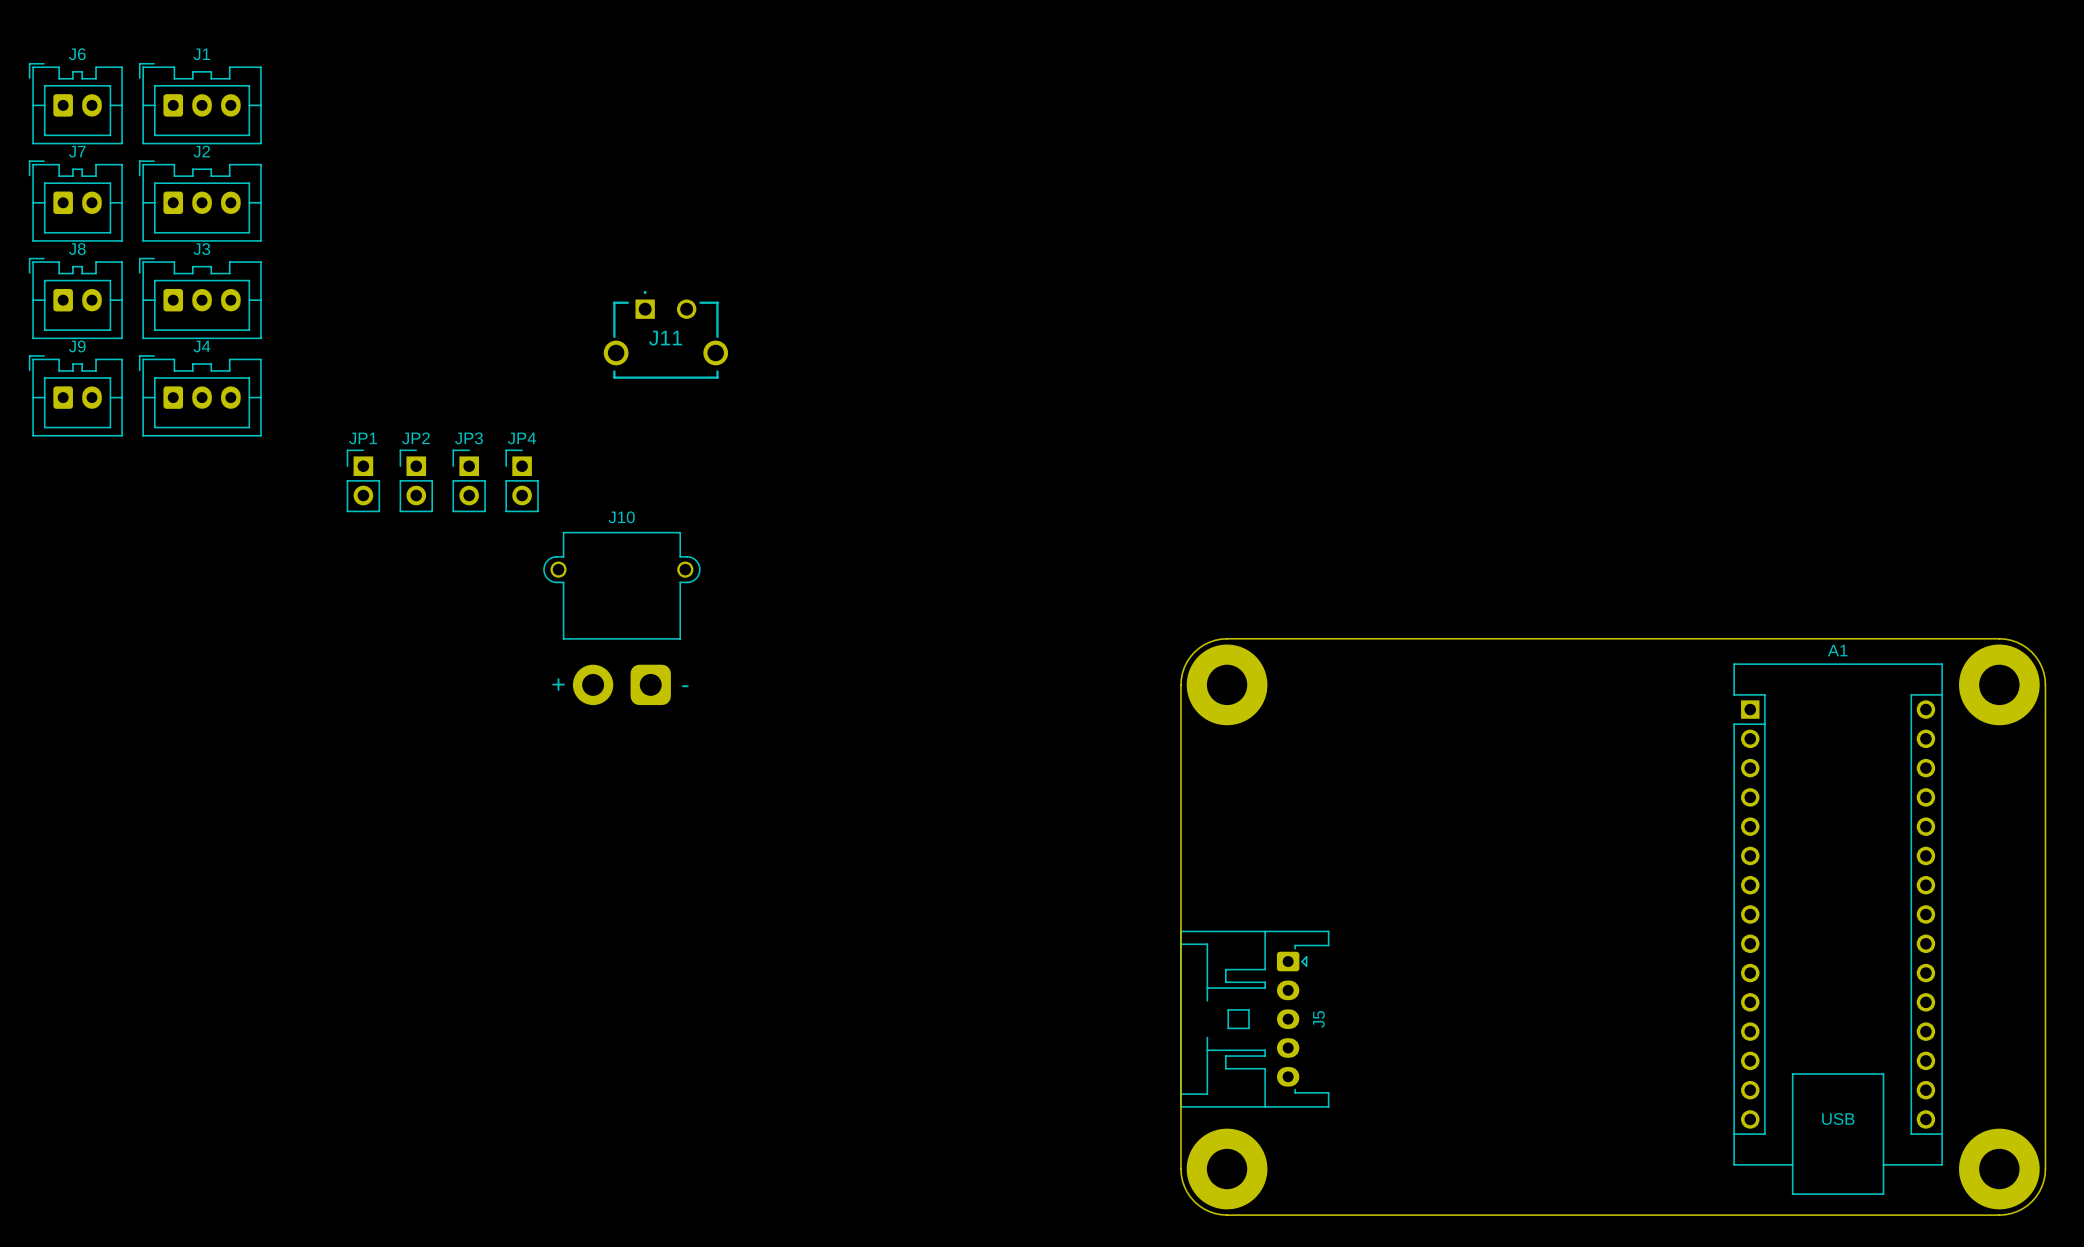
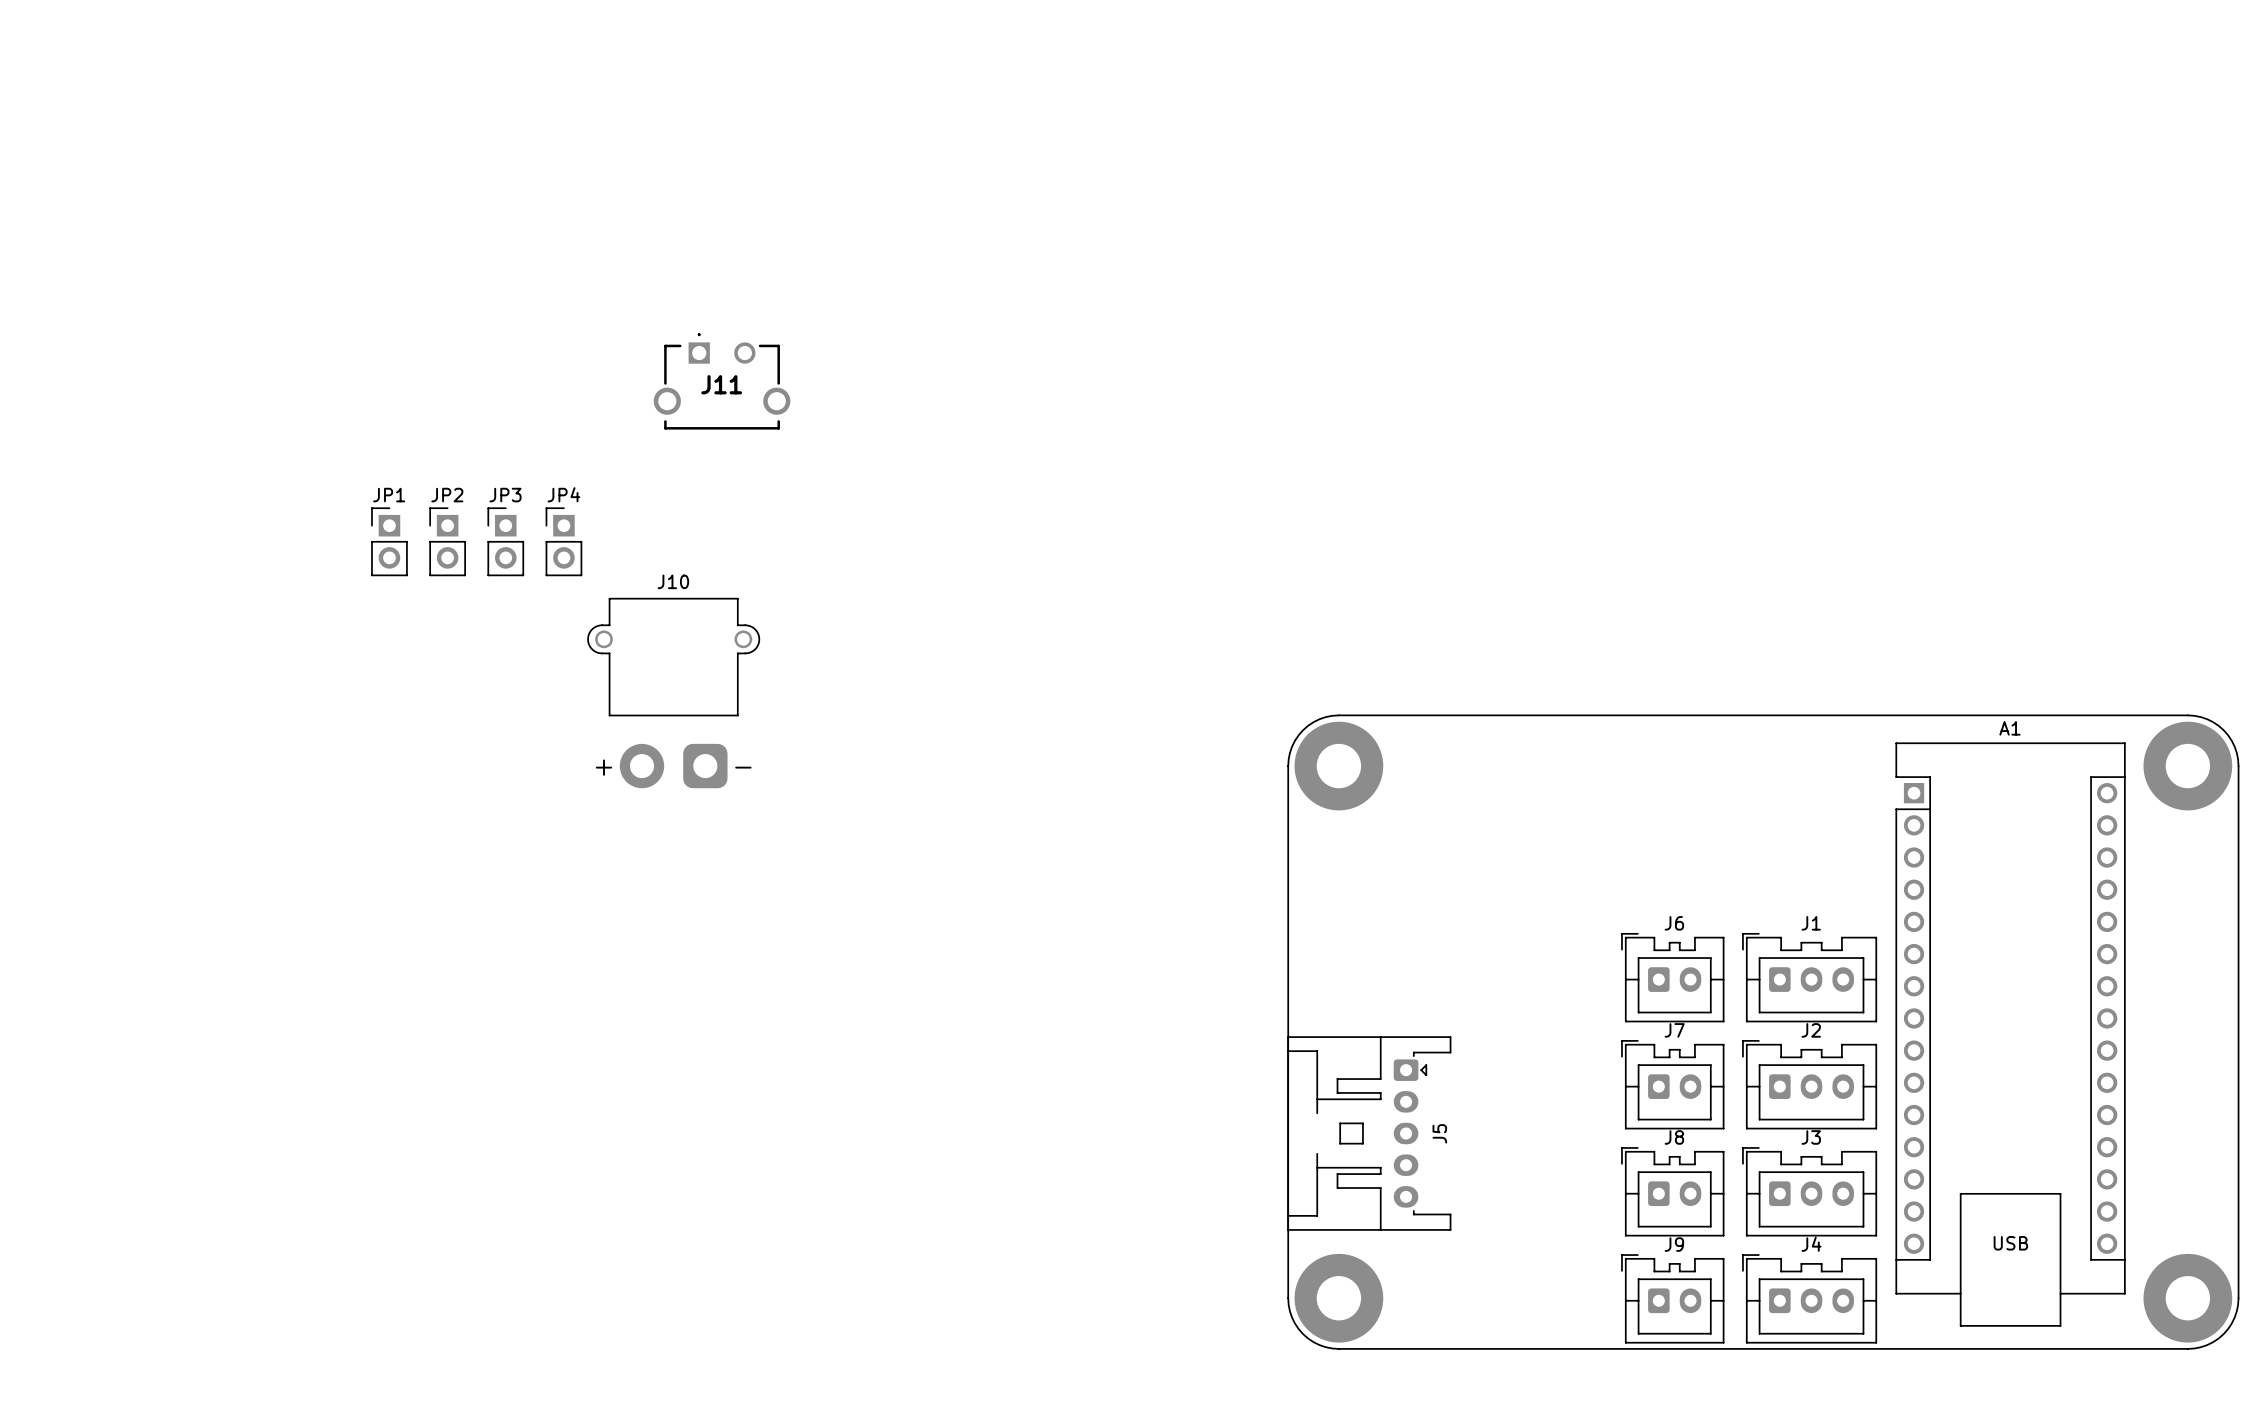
J6 position: (75, 103) -> (1672, 977)
J1 position: (200, 103) -> (1809, 977)
J7 position: (75, 201) -> (1672, 1084)
J2 position: (200, 201) -> (1809, 1084)
J8 position: (75, 298) -> (1672, 1191)
J3 position: (200, 298) -> (1809, 1191)
J9 position: (75, 395) -> (1672, 1298)
J4 position: (200, 395) -> (1809, 1298)

